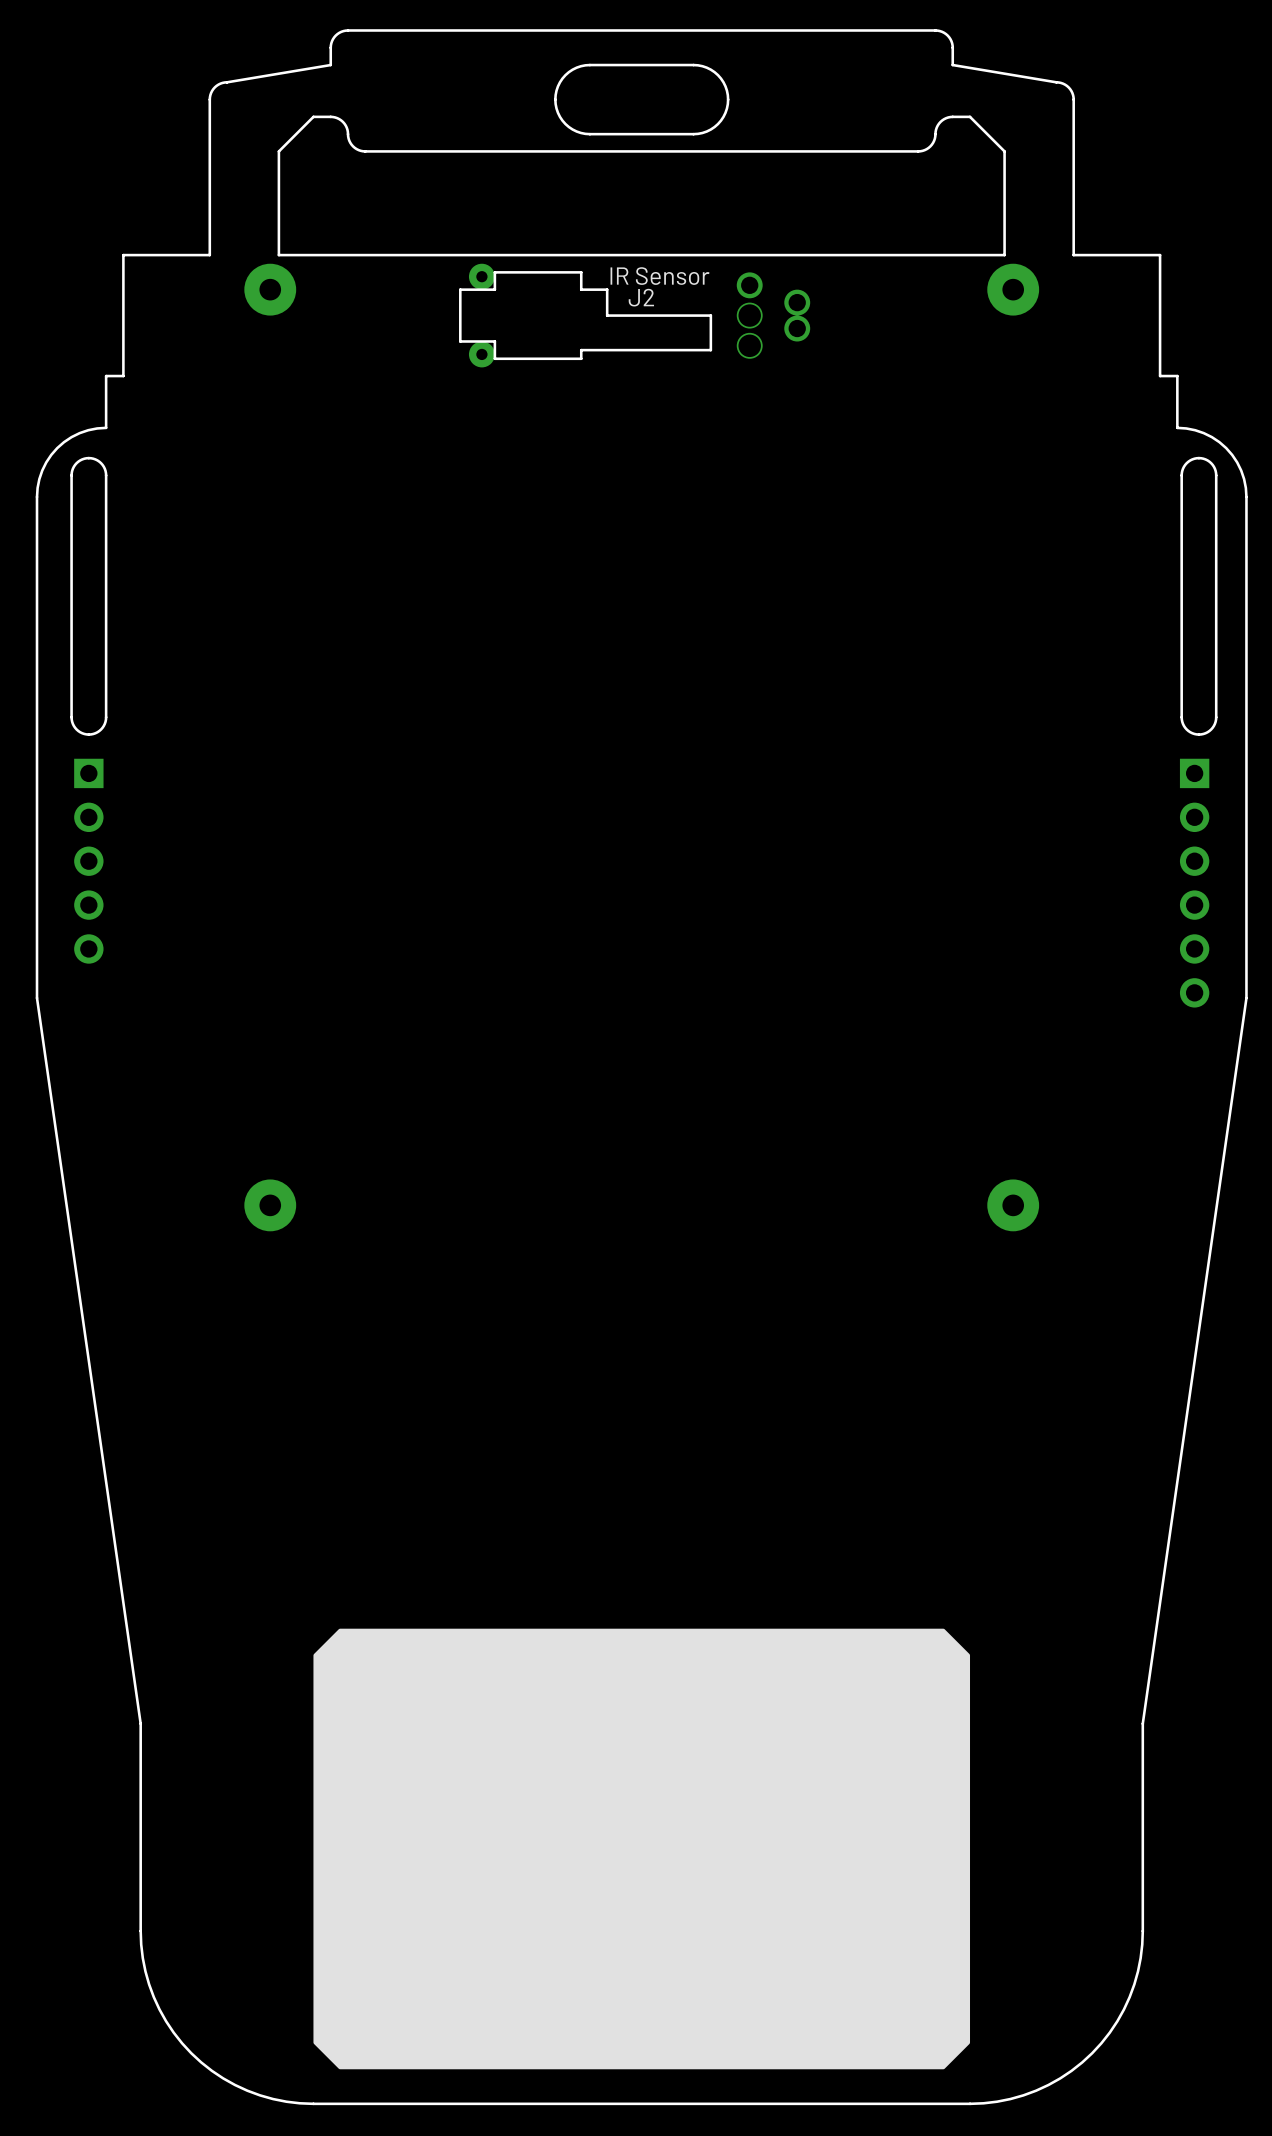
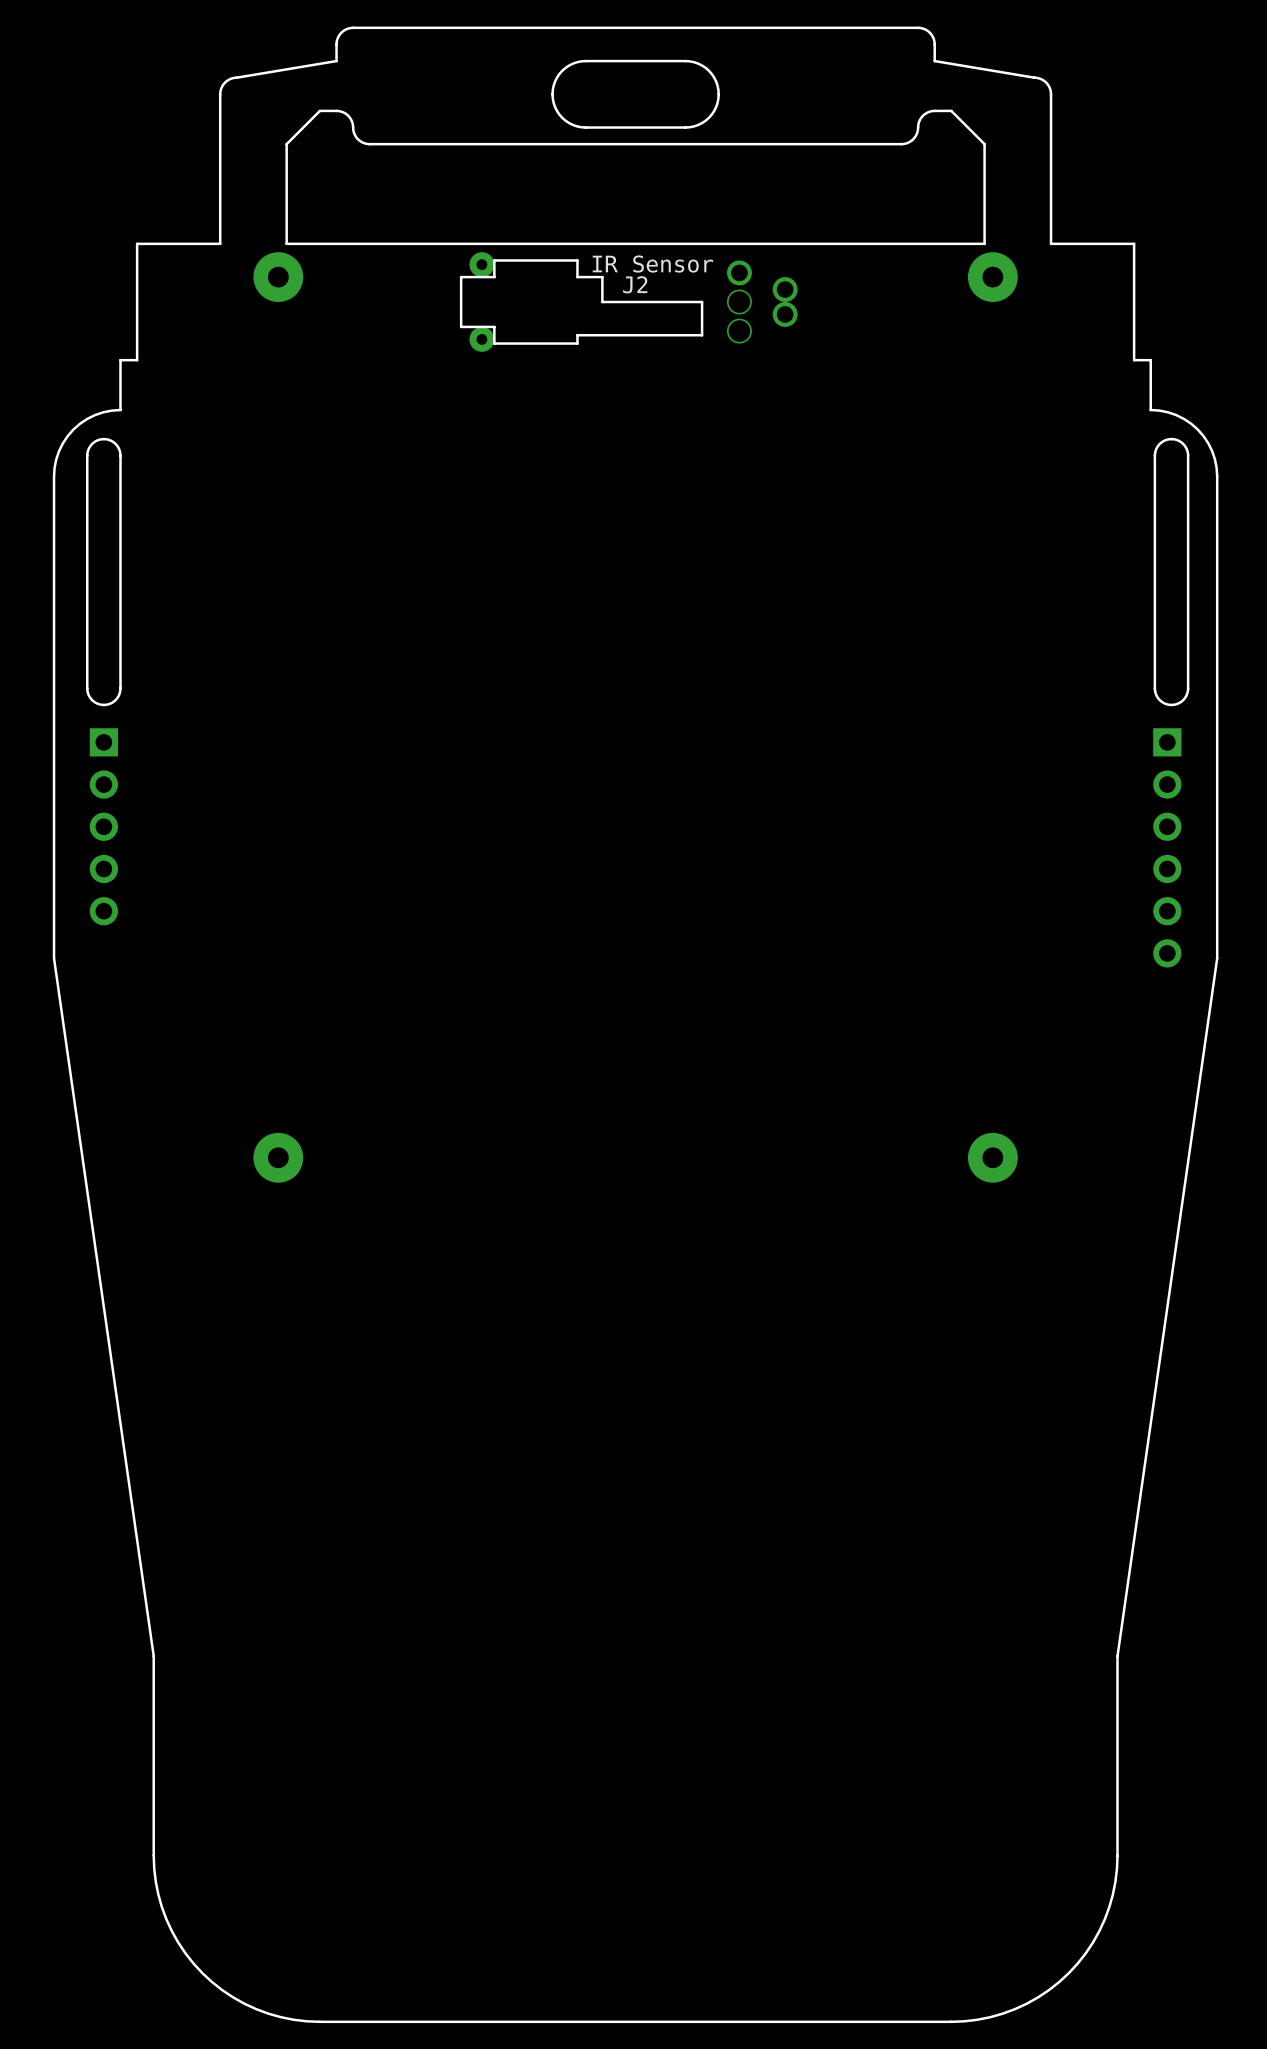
drawing: [313, 1628, 971, 2070] -> none

